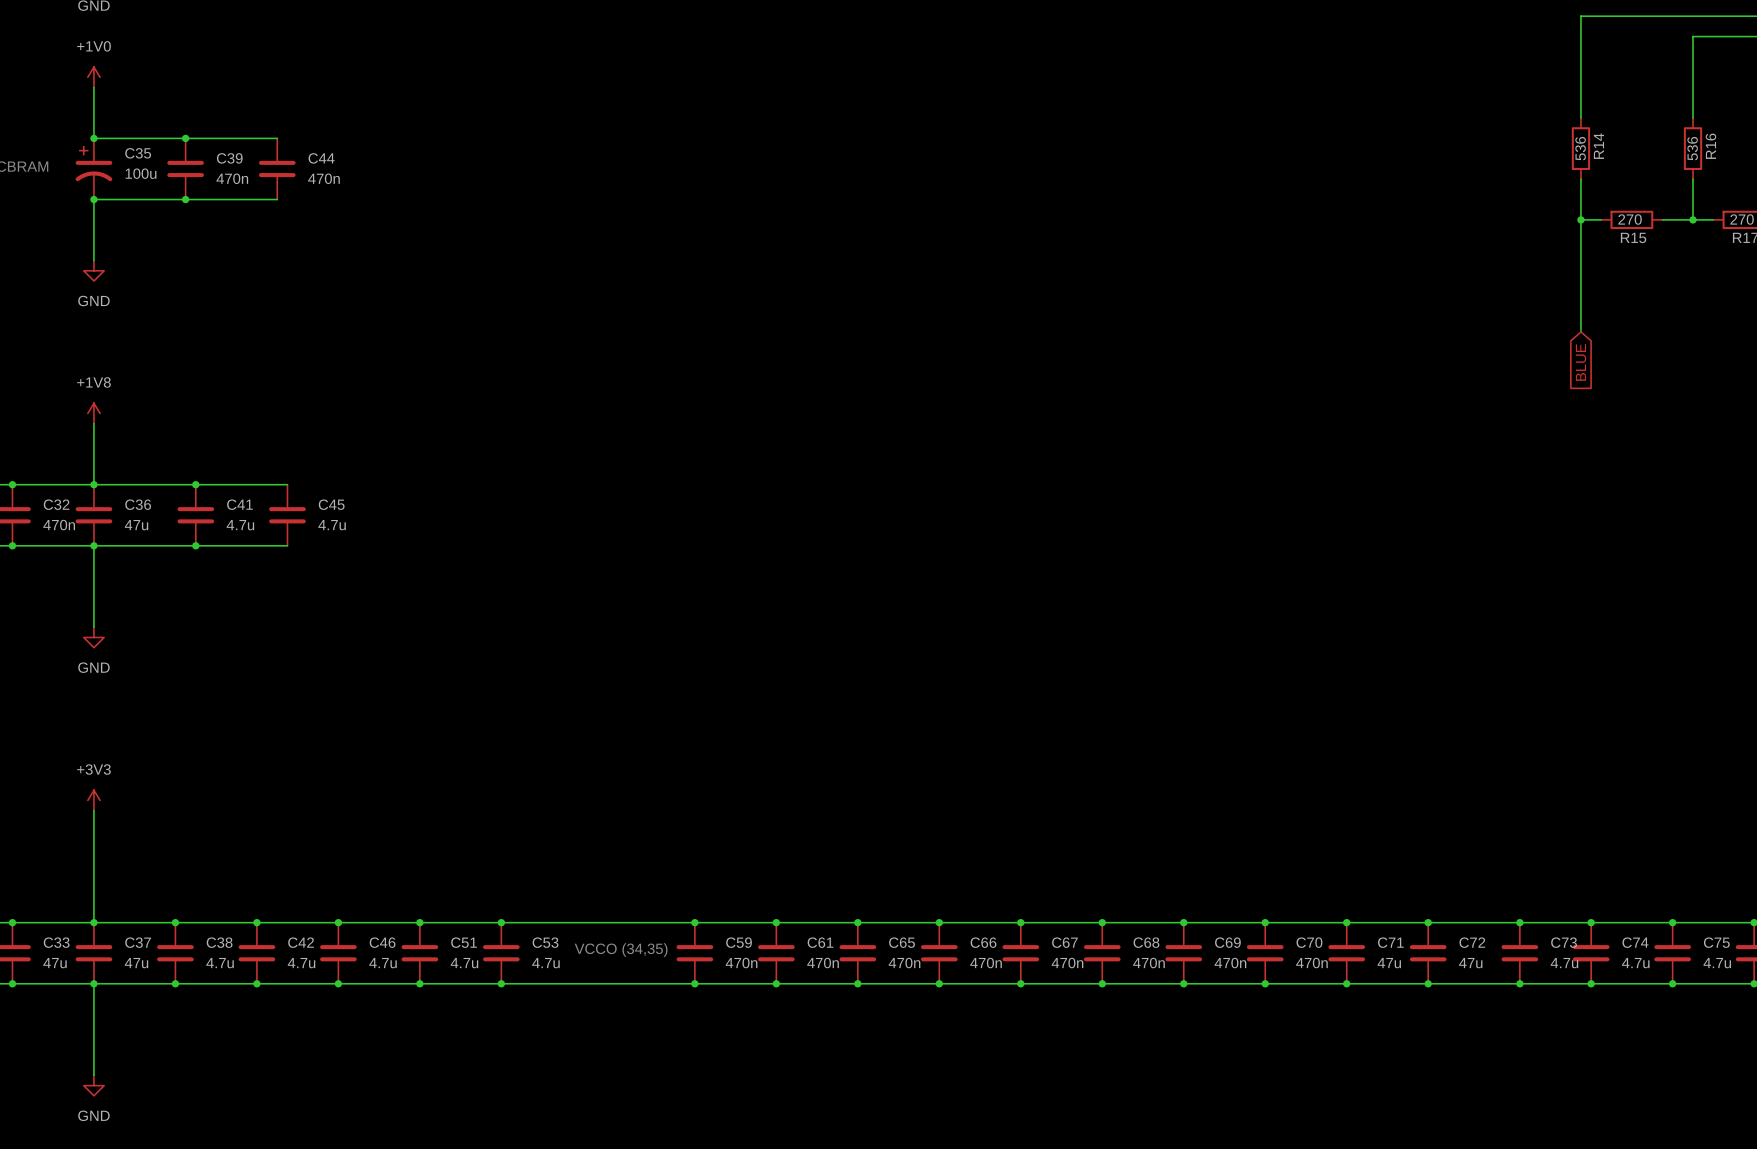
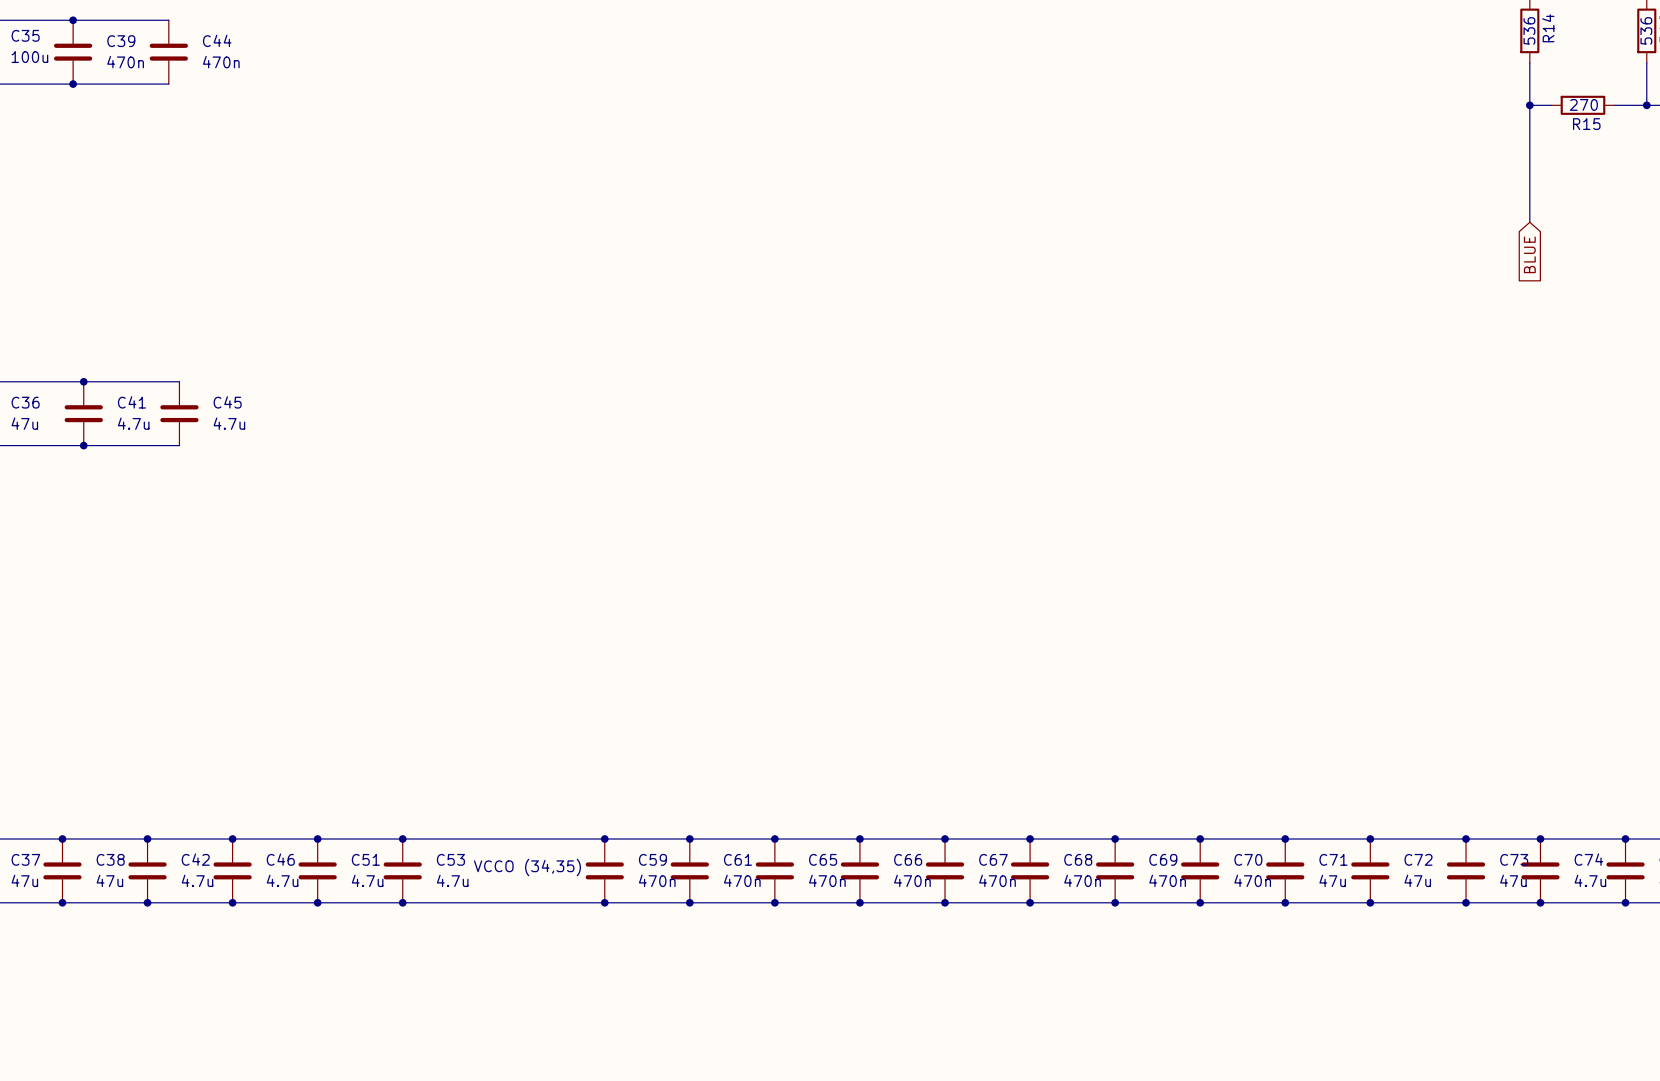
C38 value: 4.7u (220, 963) -> 47u (109, 880)
C73 value: 4.7u (1564, 963) -> 47u (1513, 880)

